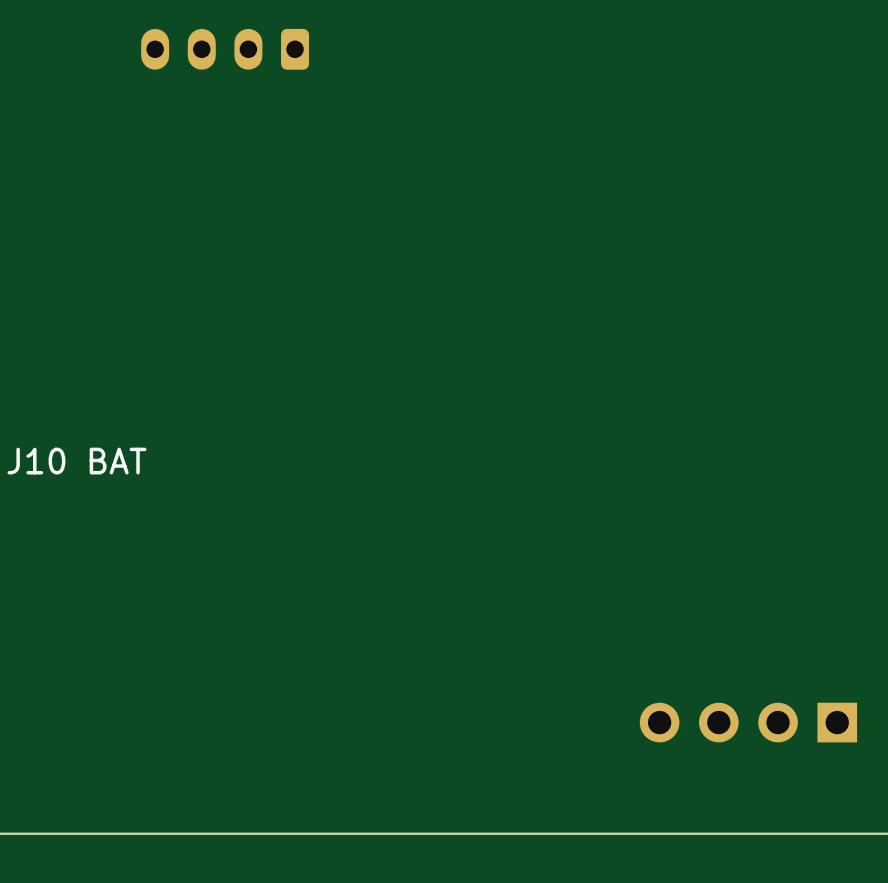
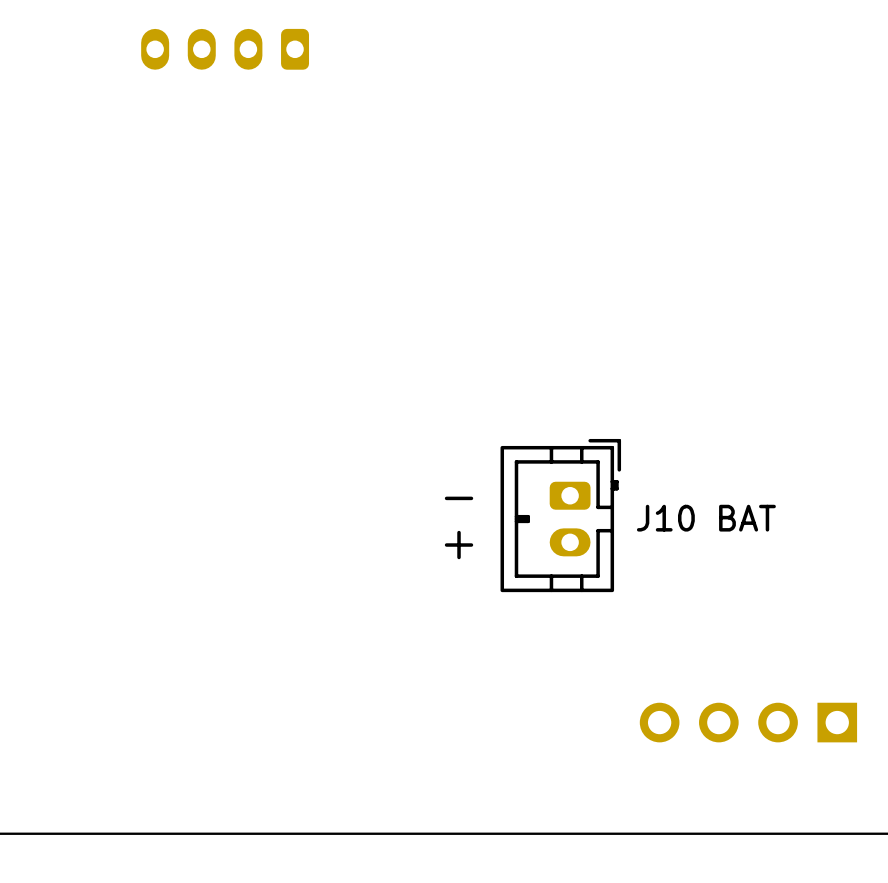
text: J10 BAT (76, 461) -> none
text: none -> - (459, 498)
part: none -> (560, 515)
text: none -> J10 BAT (706, 518)
text: none -> + (459, 545)

